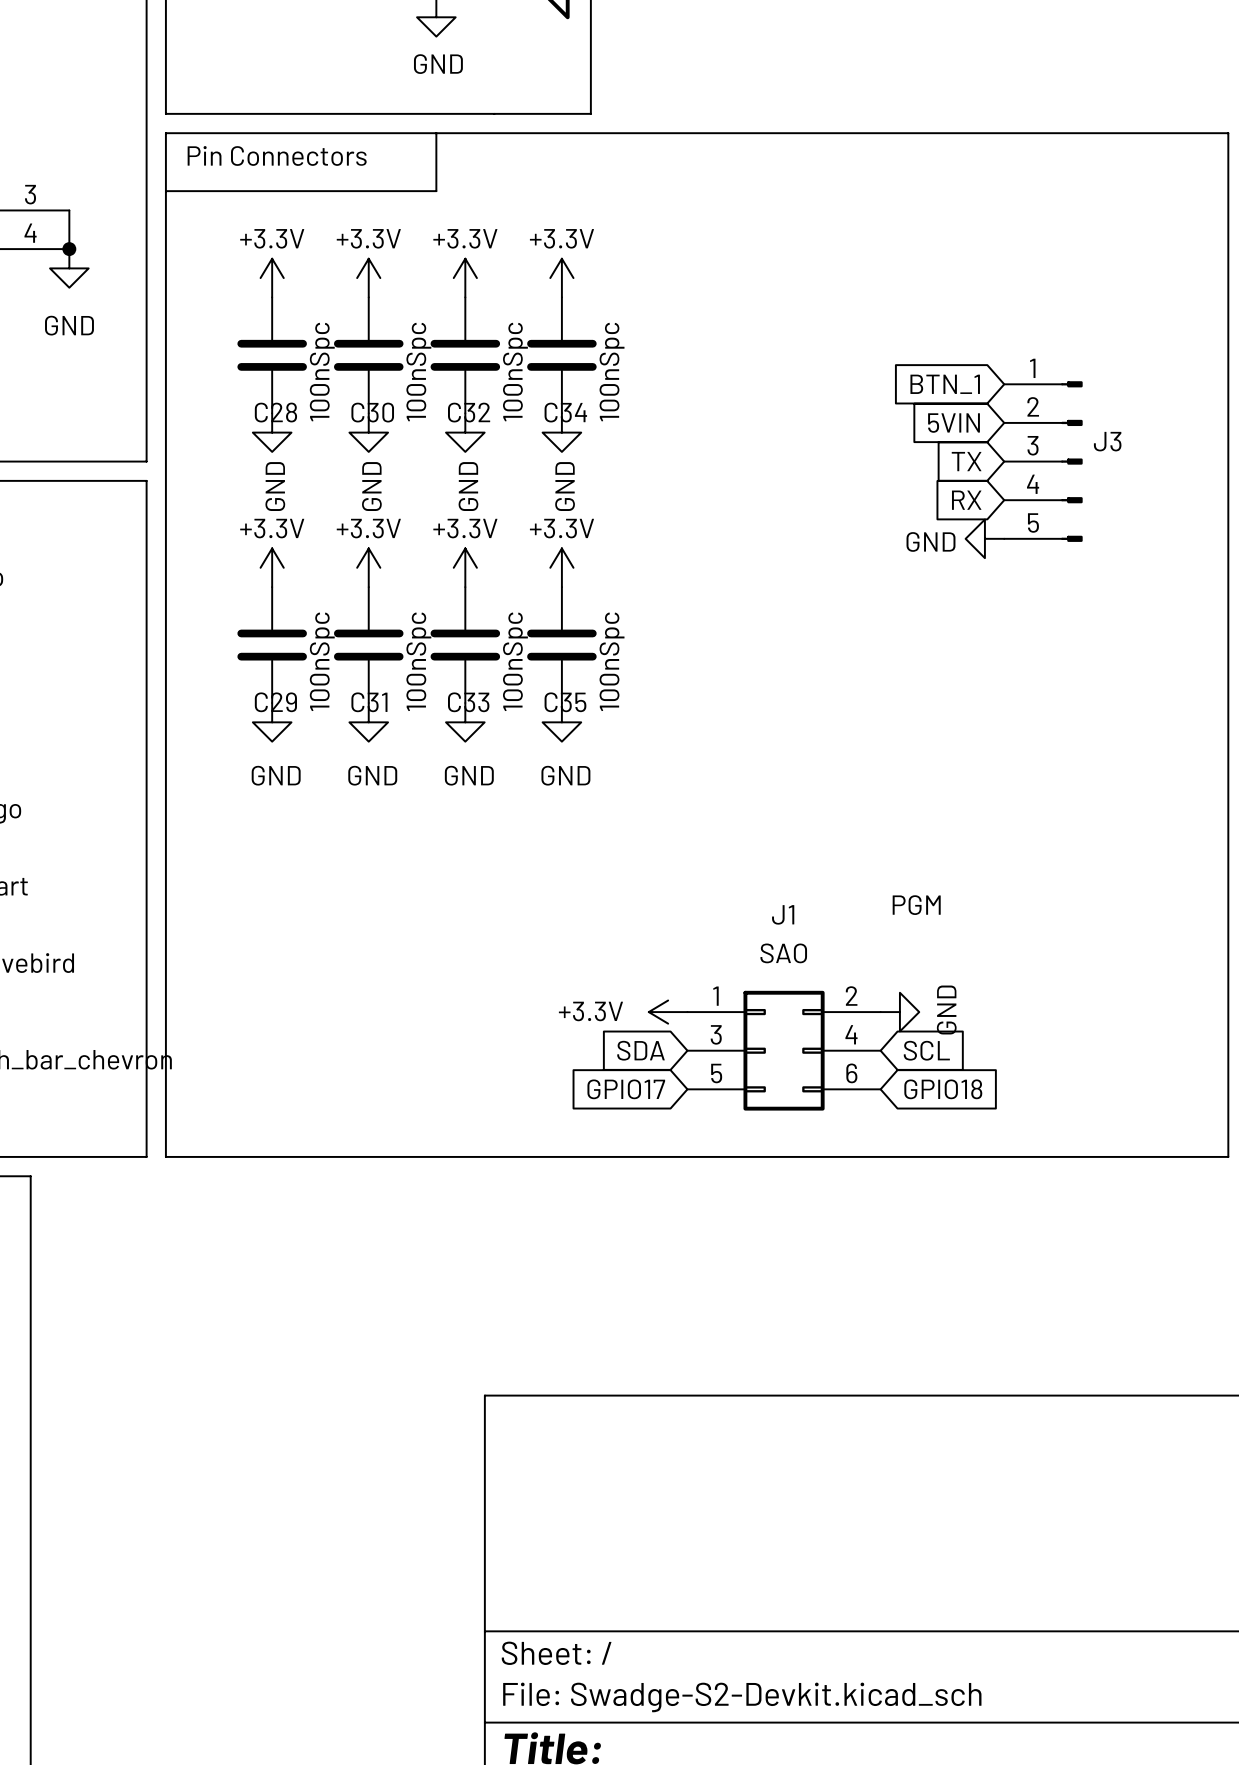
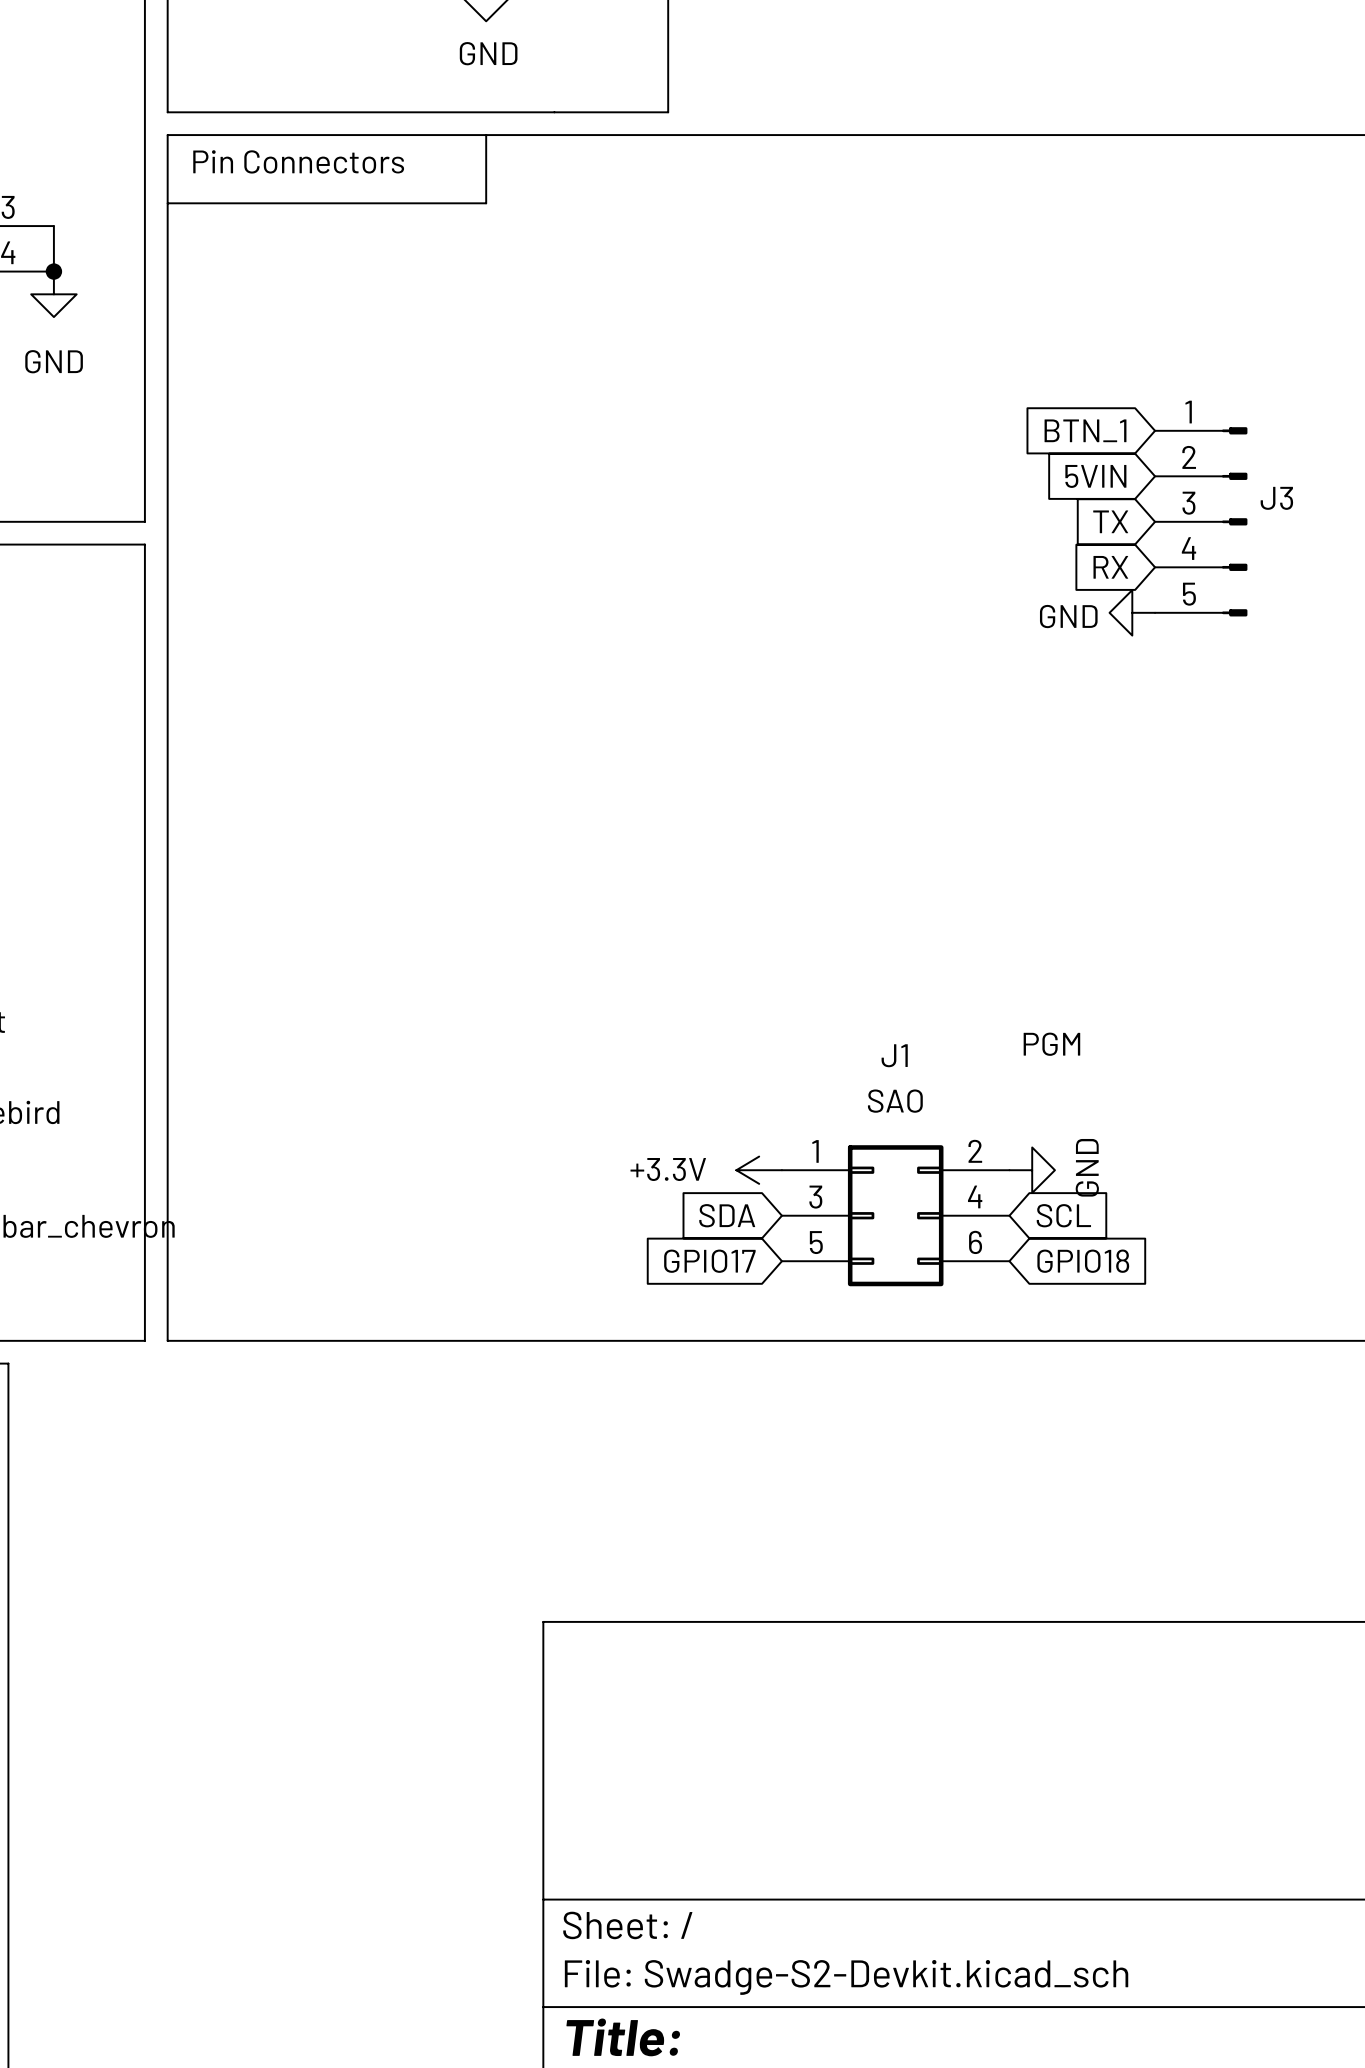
power symbol: +3.3V (272, 278) -> none
power symbol: +3.3V (368, 278) -> none
power symbol: +3.3V (465, 278) -> none
power symbol: +3.3V (561, 278) -> none
C28: 100nSpc (272, 355) -> none
C30: 100nSpc (368, 355) -> none
C32: 100nSpc (465, 355) -> none
C34: 100nSpc (561, 355) -> none
power symbol: GND (272, 432) -> none
power symbol: GND (368, 432) -> none
power symbol: GND (465, 432) -> none
power symbol: GND (561, 432) -> none
power symbol: +3.3V (272, 567) -> none
power symbol: +3.3V (368, 567) -> none
power symbol: +3.3V (465, 567) -> none
power symbol: +3.3V (561, 567) -> none
C29: 100nSpc (272, 645) -> none
C31: 100nSpc (368, 645) -> none
C33: 100nSpc (465, 645) -> none
C35: 100nSpc (561, 645) -> none
power symbol: GND (272, 722) -> none
power symbol: GND (368, 722) -> none
power symbol: GND (465, 722) -> none
power symbol: GND (561, 722) -> none

